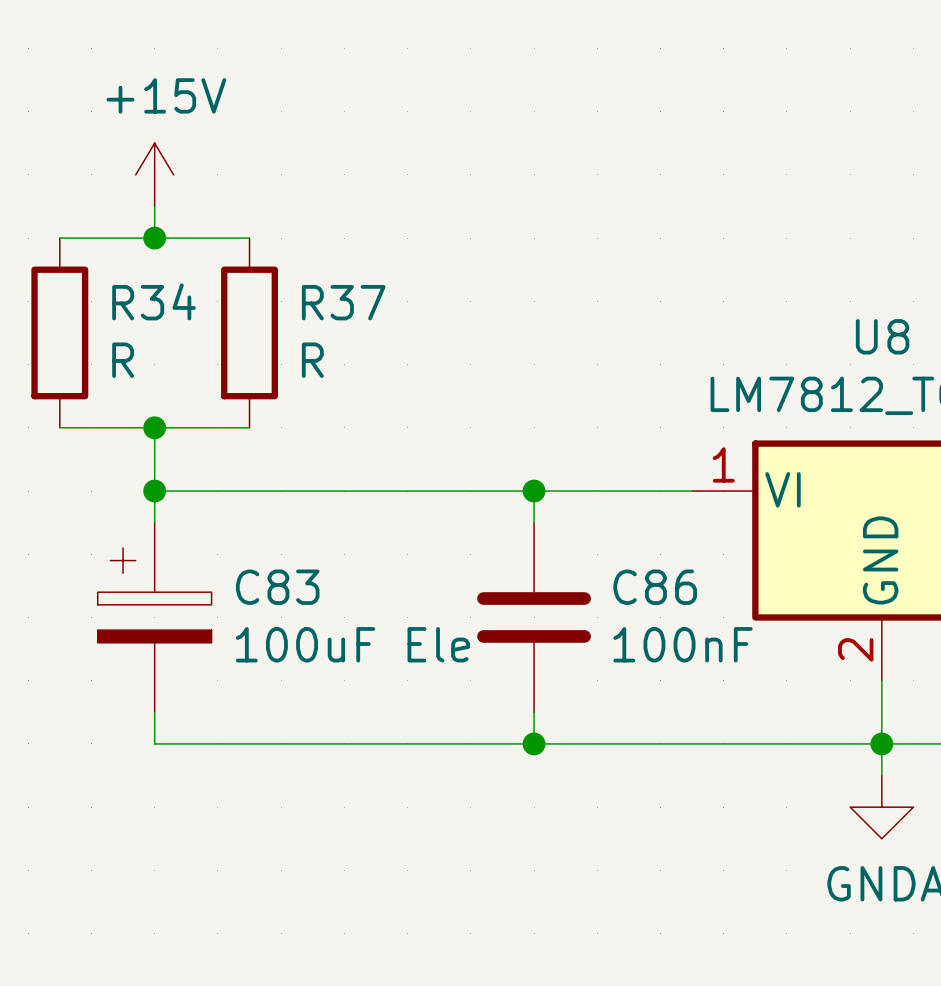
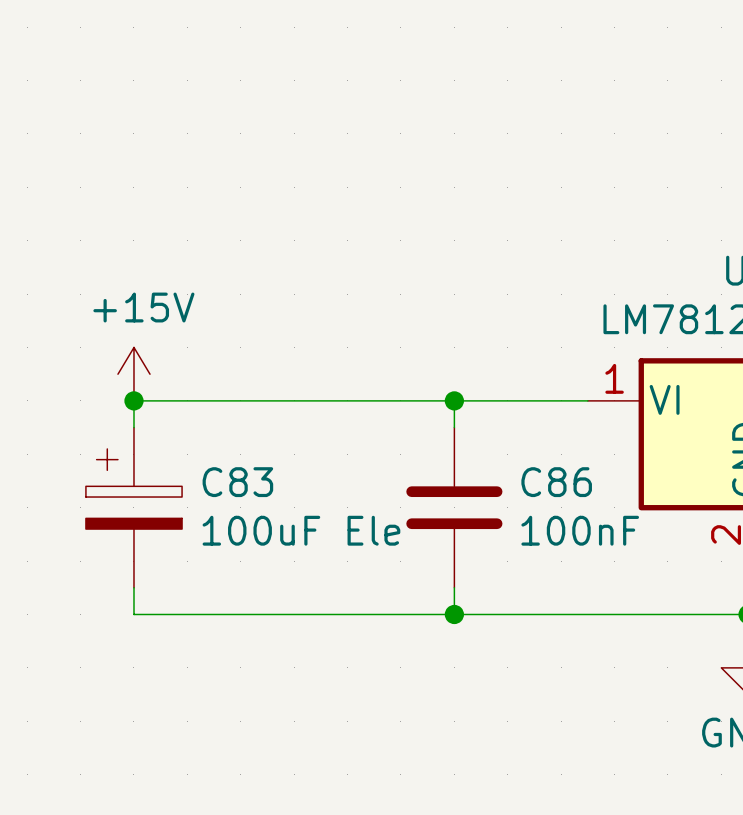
power symbol position: +15V (154, 174) -> +15V (133, 374)
wire: (154, 206) (154, 238) -> none
wire: (59, 238) (249, 238) -> none
junction: (154, 238) -> none
R34: R (59, 332) -> none
R37: R (249, 332) -> none
wire: (59, 427) (249, 427) -> none
junction: (154, 427) -> none

